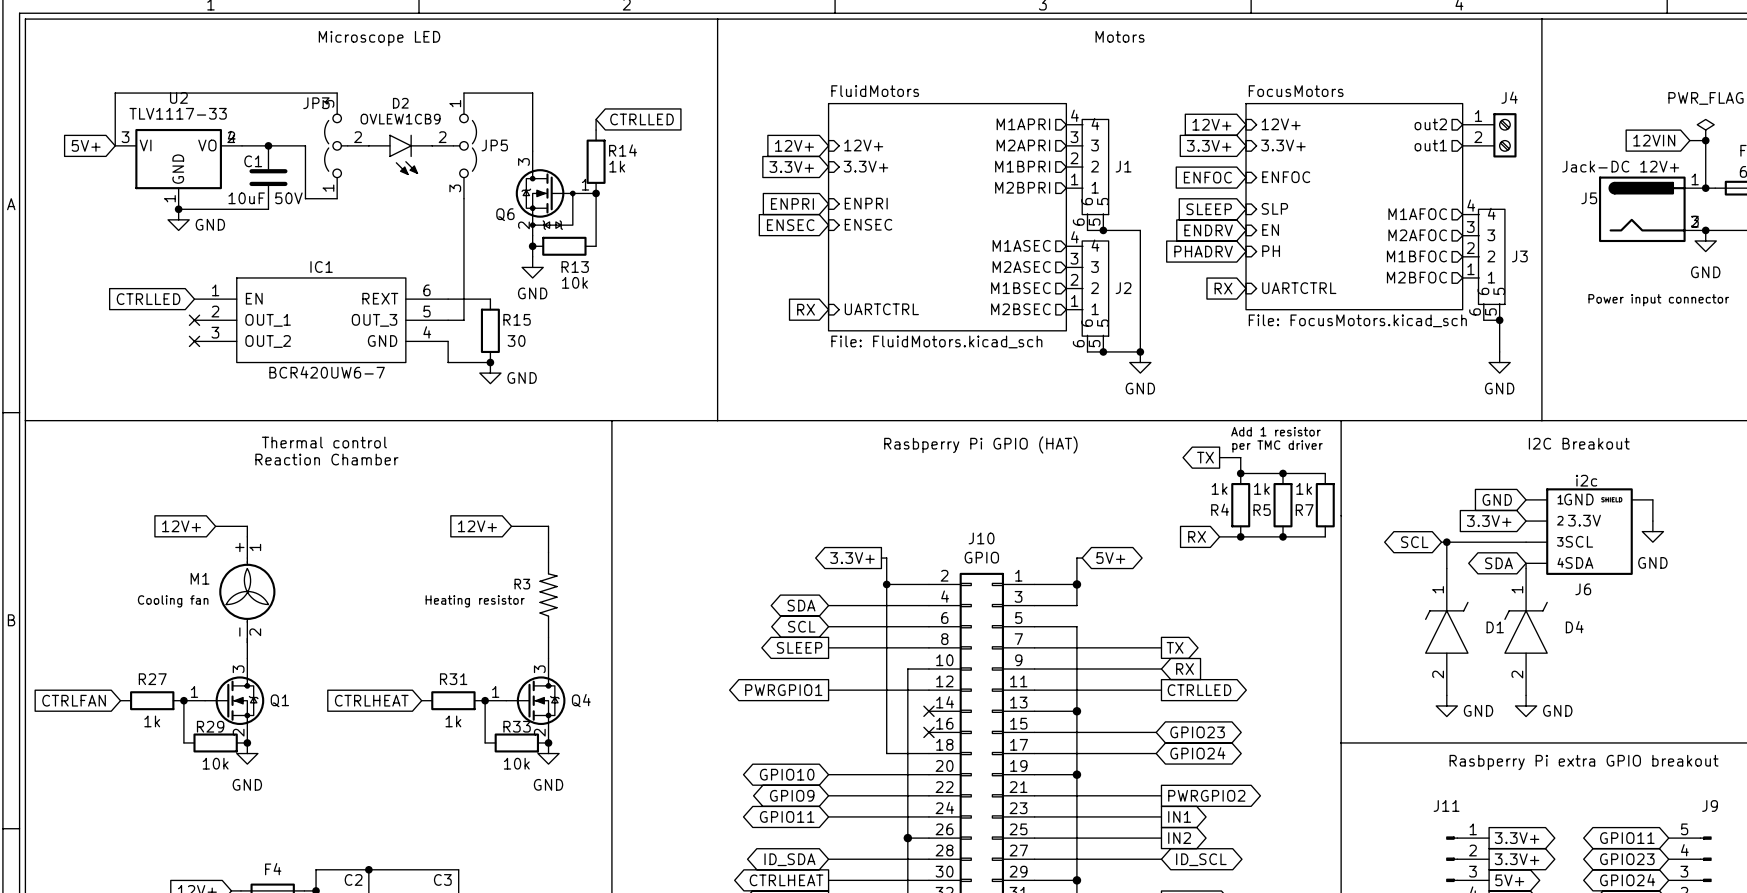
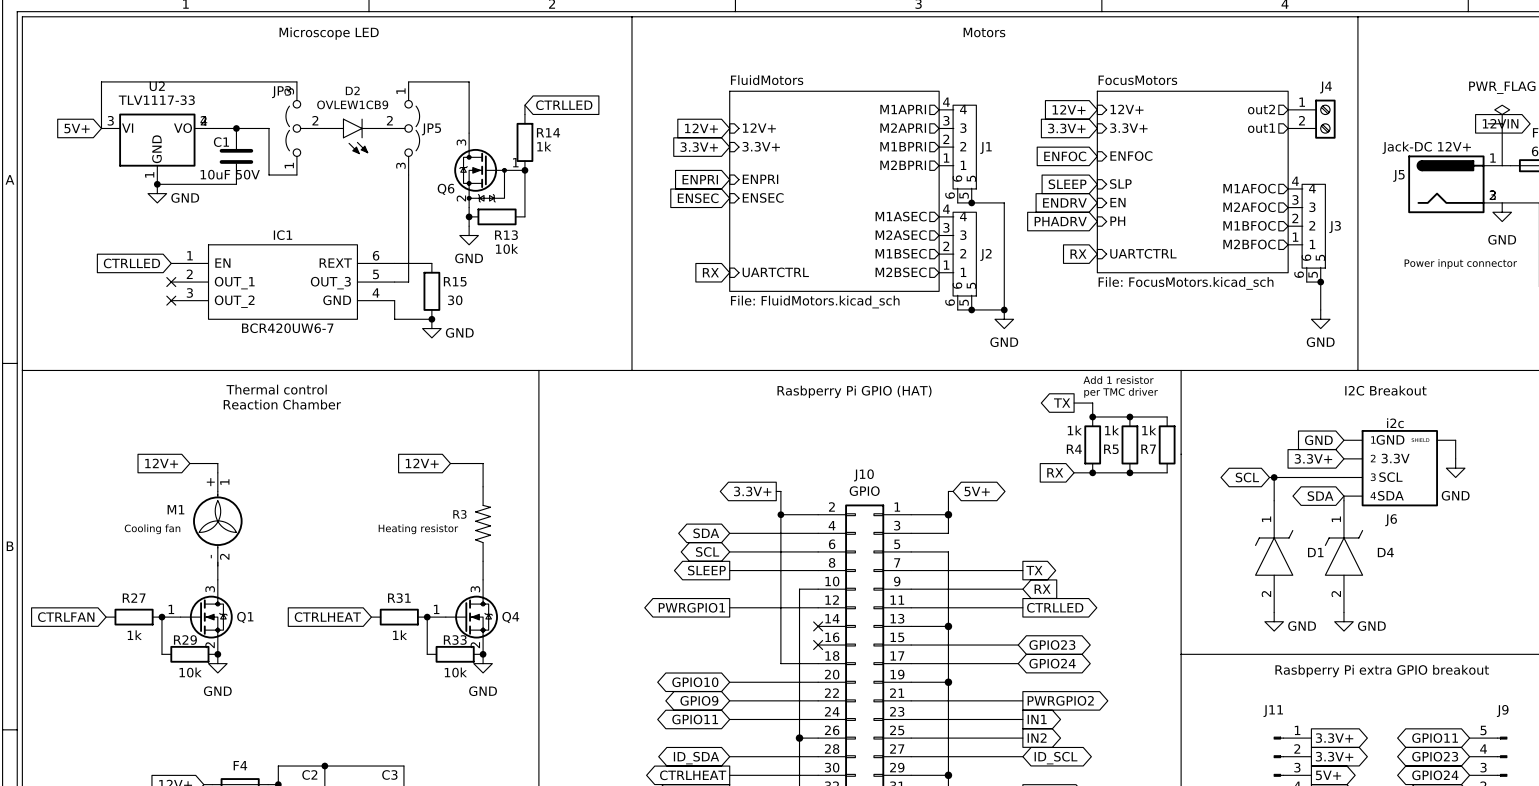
global label position: 12VIN (1654, 140) -> 12VIN (1500, 123)
junction: (1705, 140) -> none
junction: (1705, 188) -> none
junction: (1705, 230) -> none

